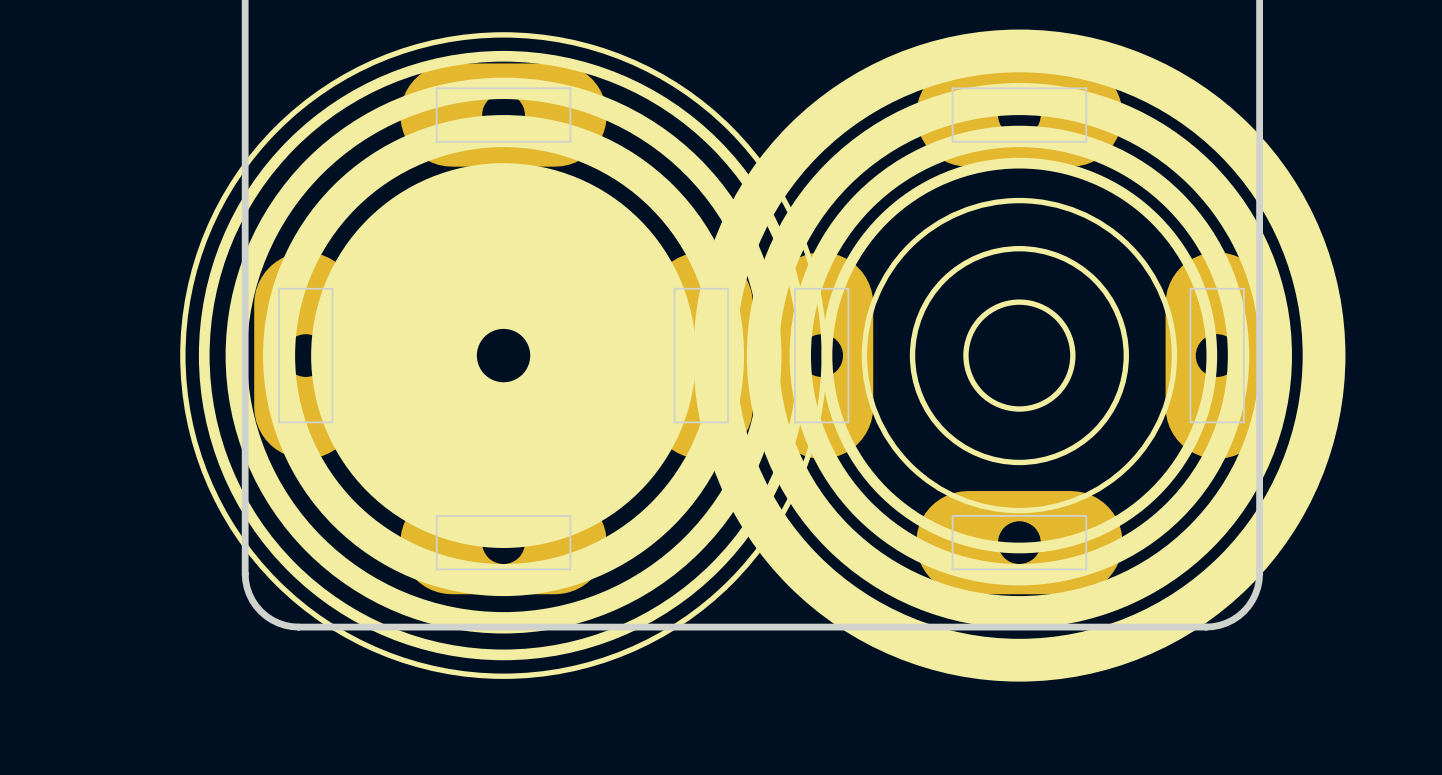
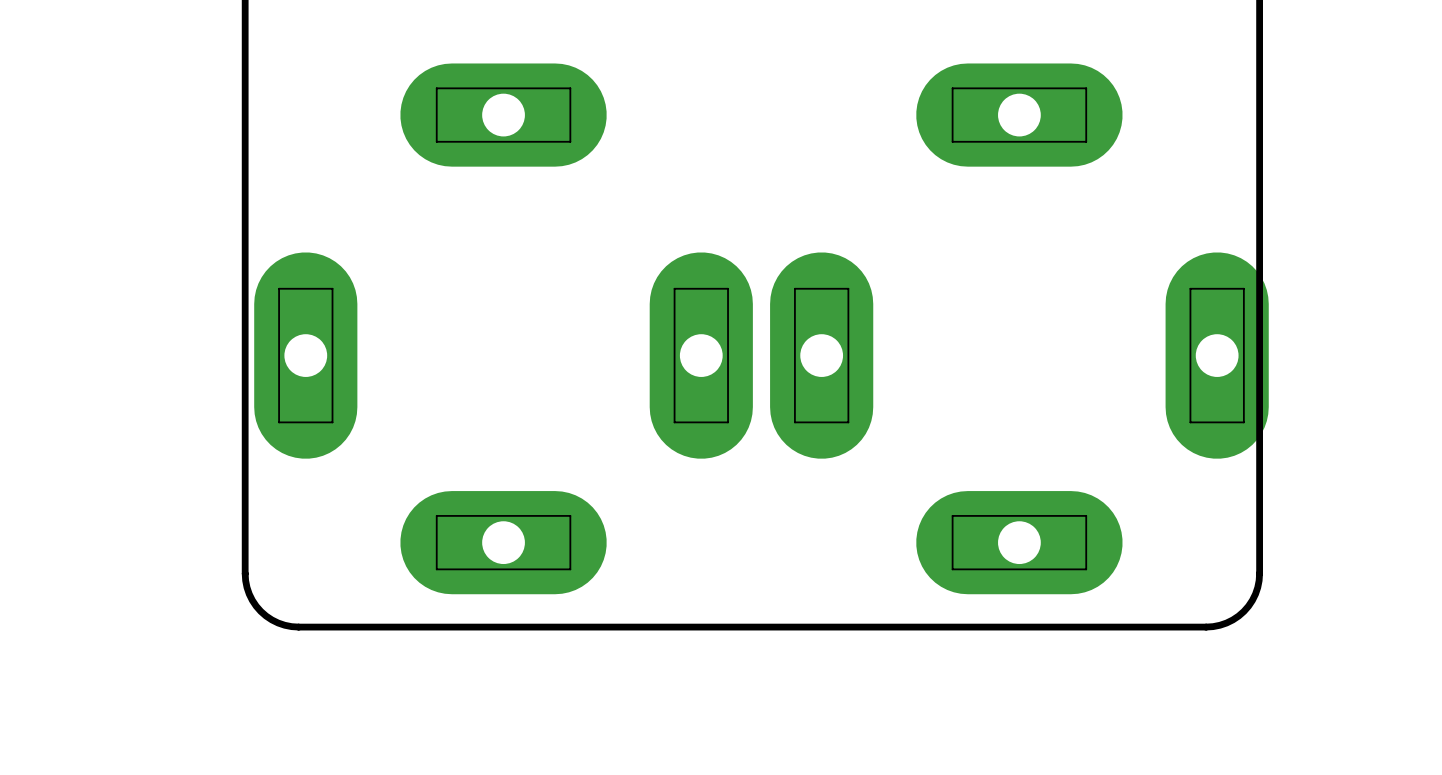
part side: top (503, 355) -> bottom (503, 328)
part side: top (1019, 355) -> bottom (1019, 328)

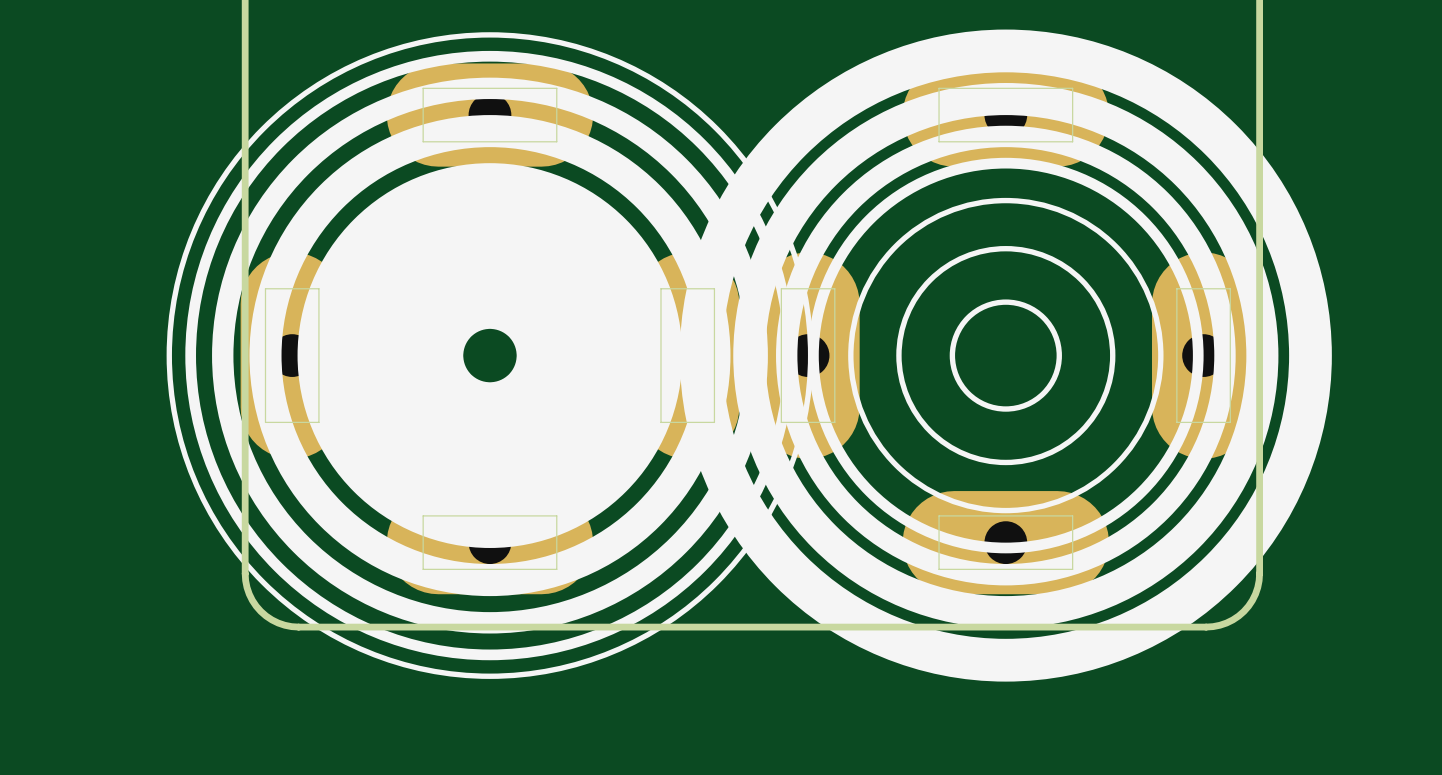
part side: bottom (503, 328) -> top (489, 355)
part side: bottom (1019, 328) -> top (1005, 355)

